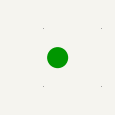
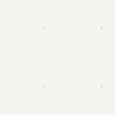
junction: (57, 57) -> none

